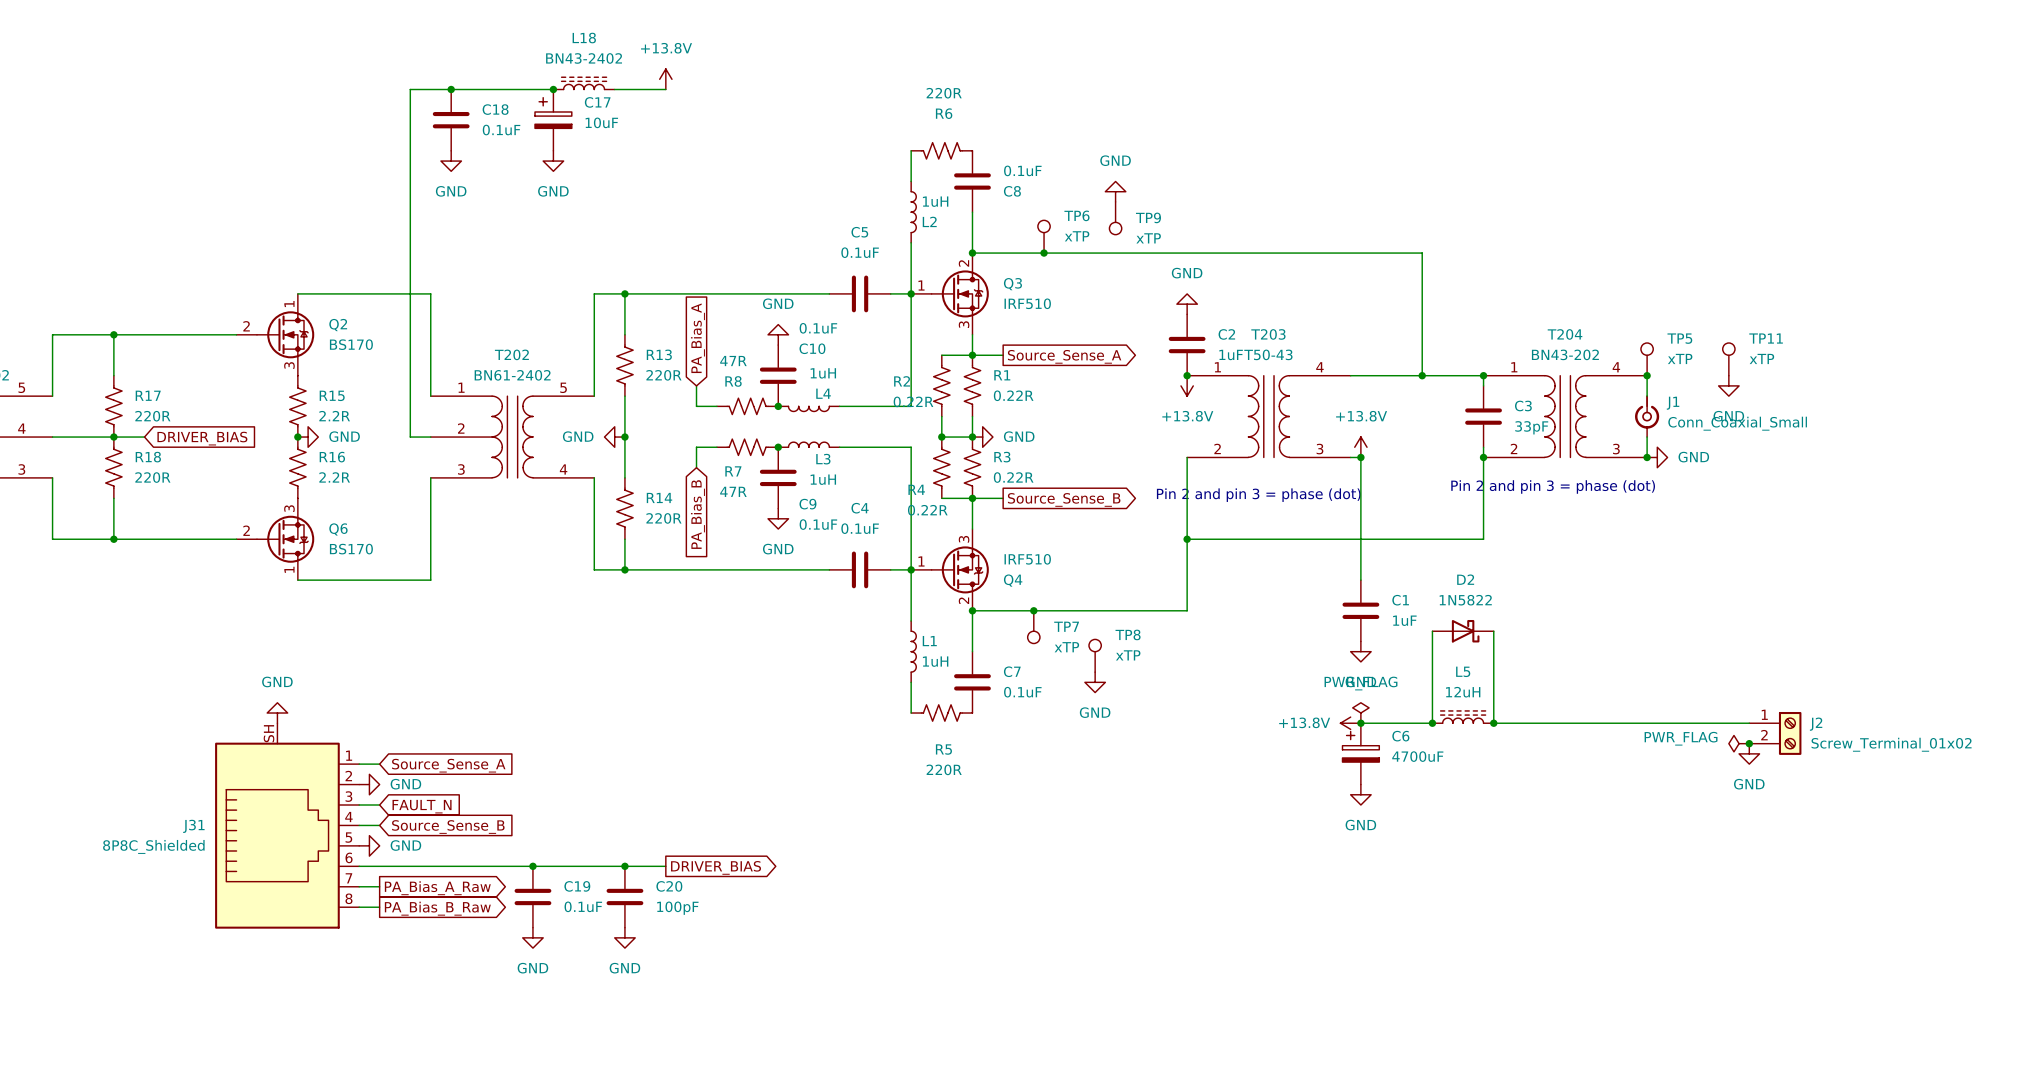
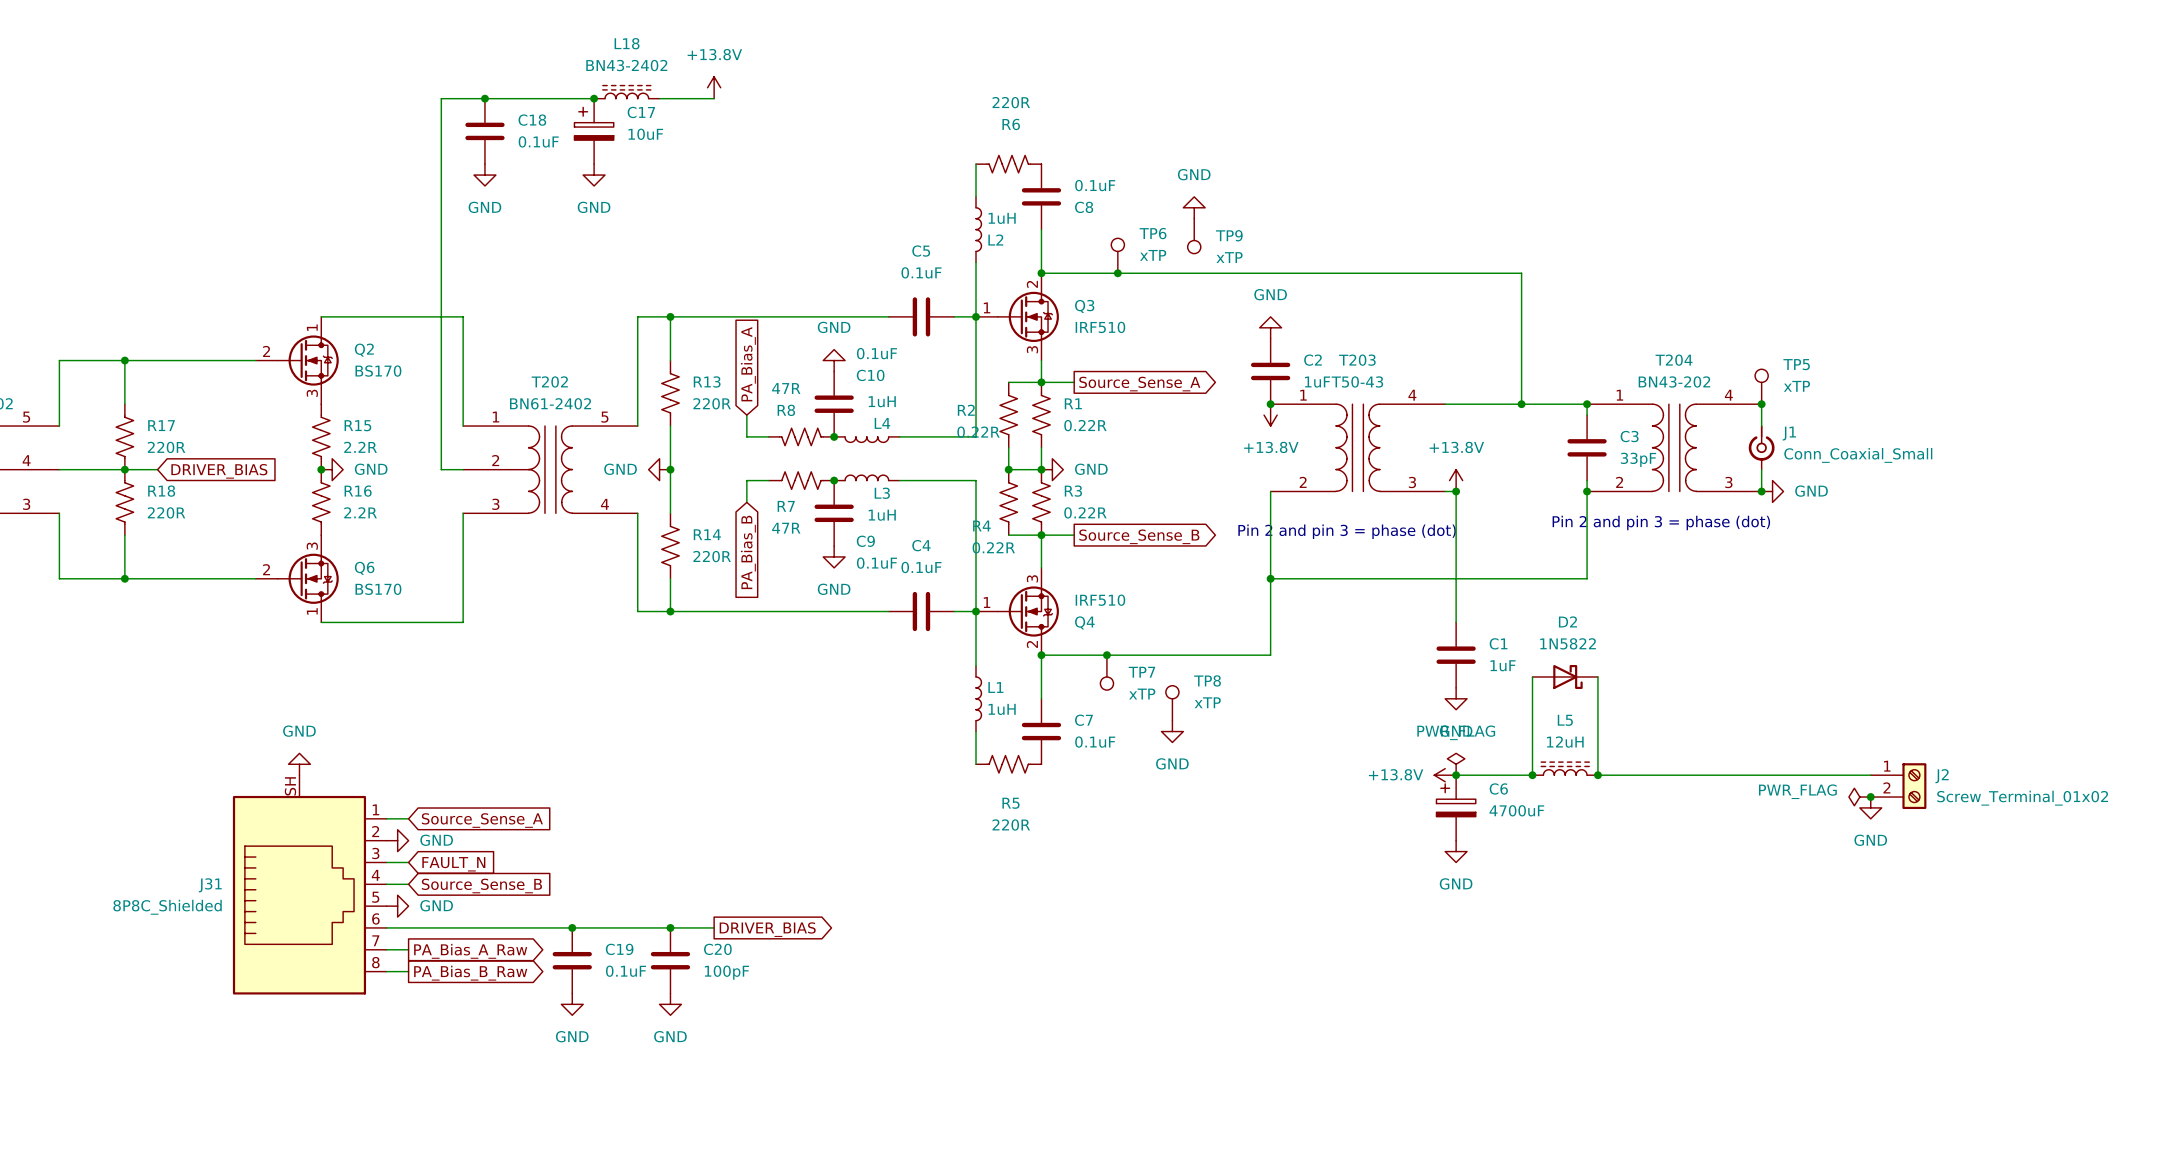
TP11: xTP (1728, 359) -> none
power symbol: GND (1728, 385) -> none

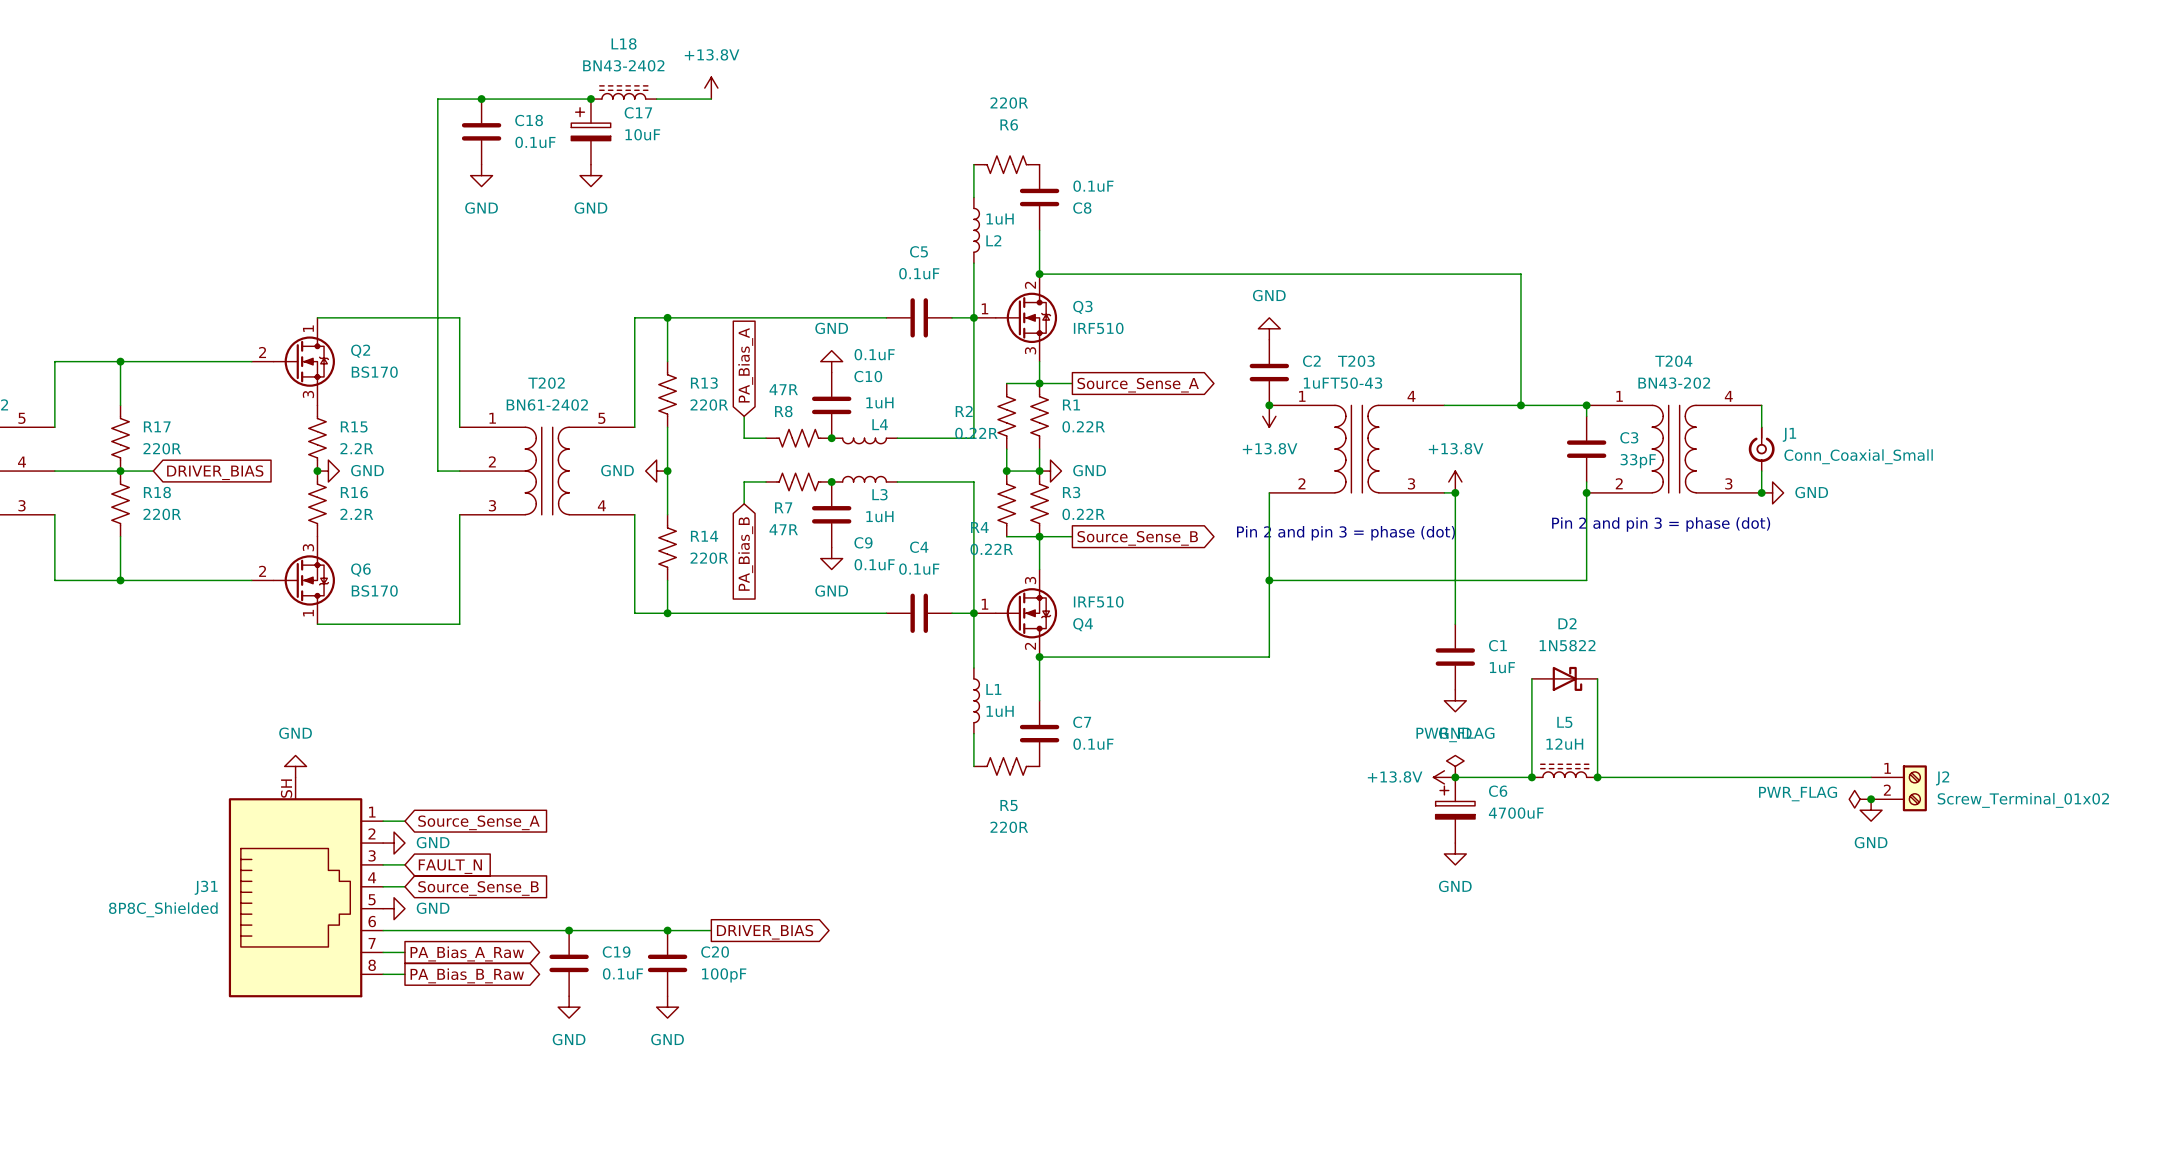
power symbol: GND (1194, 207) -> none
TP9: xTP (1194, 236) -> none
TP6: xTP (1117, 255) -> none
junction: (1117, 273) -> none
TP5: xTP (1761, 386) -> none
junction: (1761, 404) -> none
junction: (1106, 655) -> none
TP7: xTP (1106, 672) -> none
TP8: xTP (1172, 703) -> none
power symbol: GND (1172, 731) -> none

